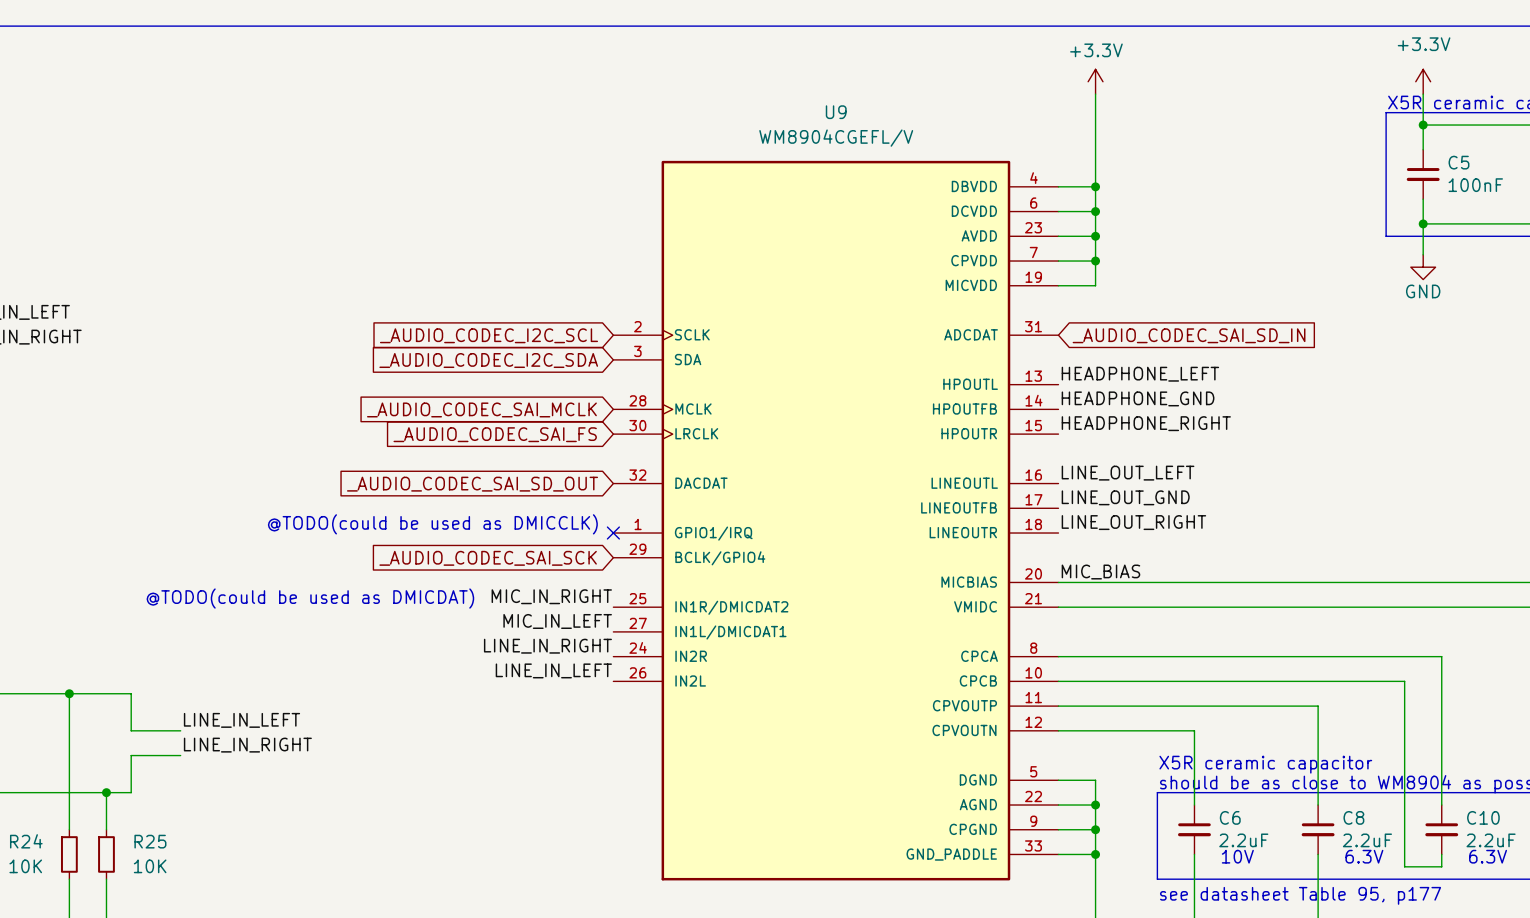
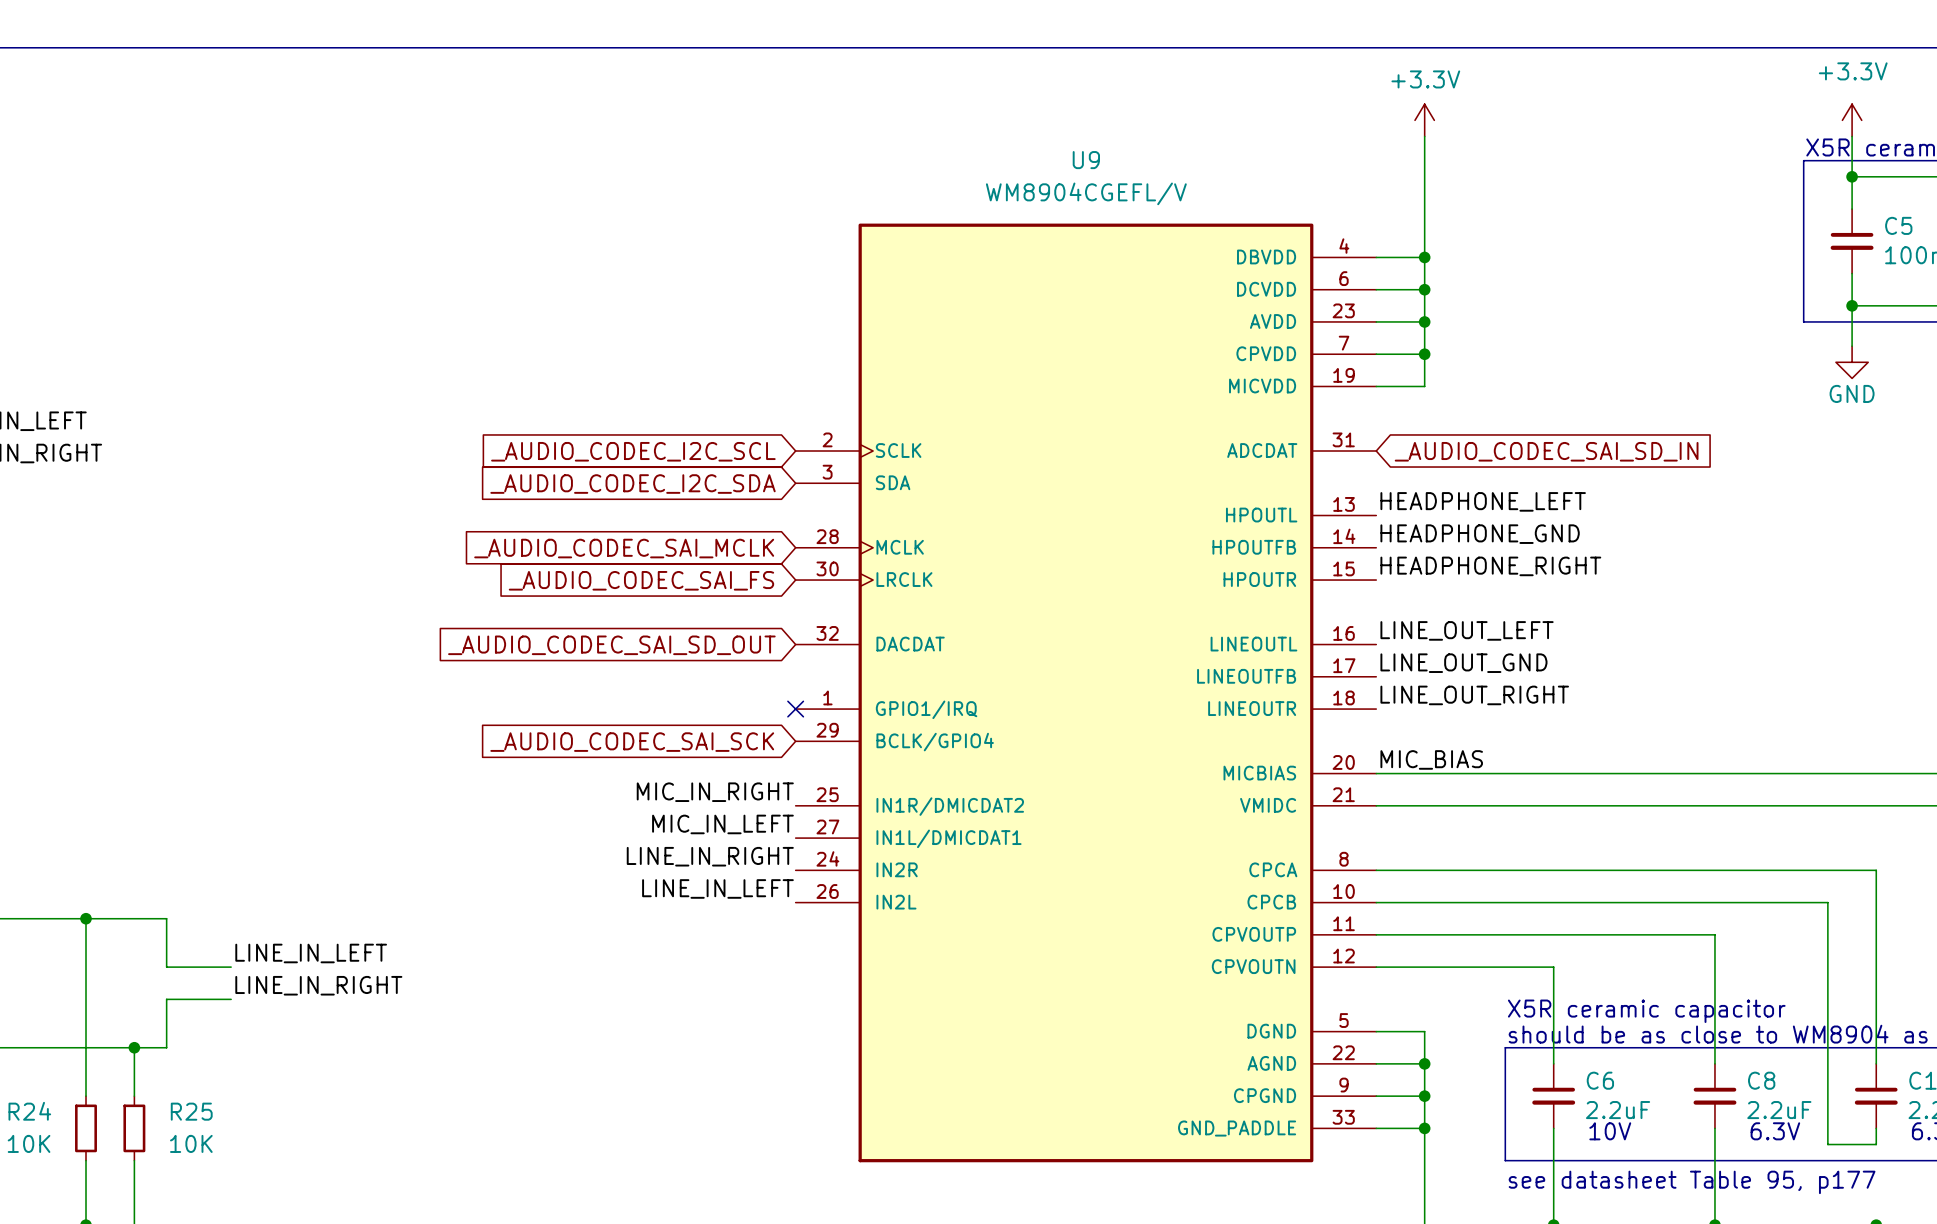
text: @TODO(could be used as DMICCLK) (432, 524) -> none
text: @TODO(could be used as DMICDAT) (310, 598) -> none

